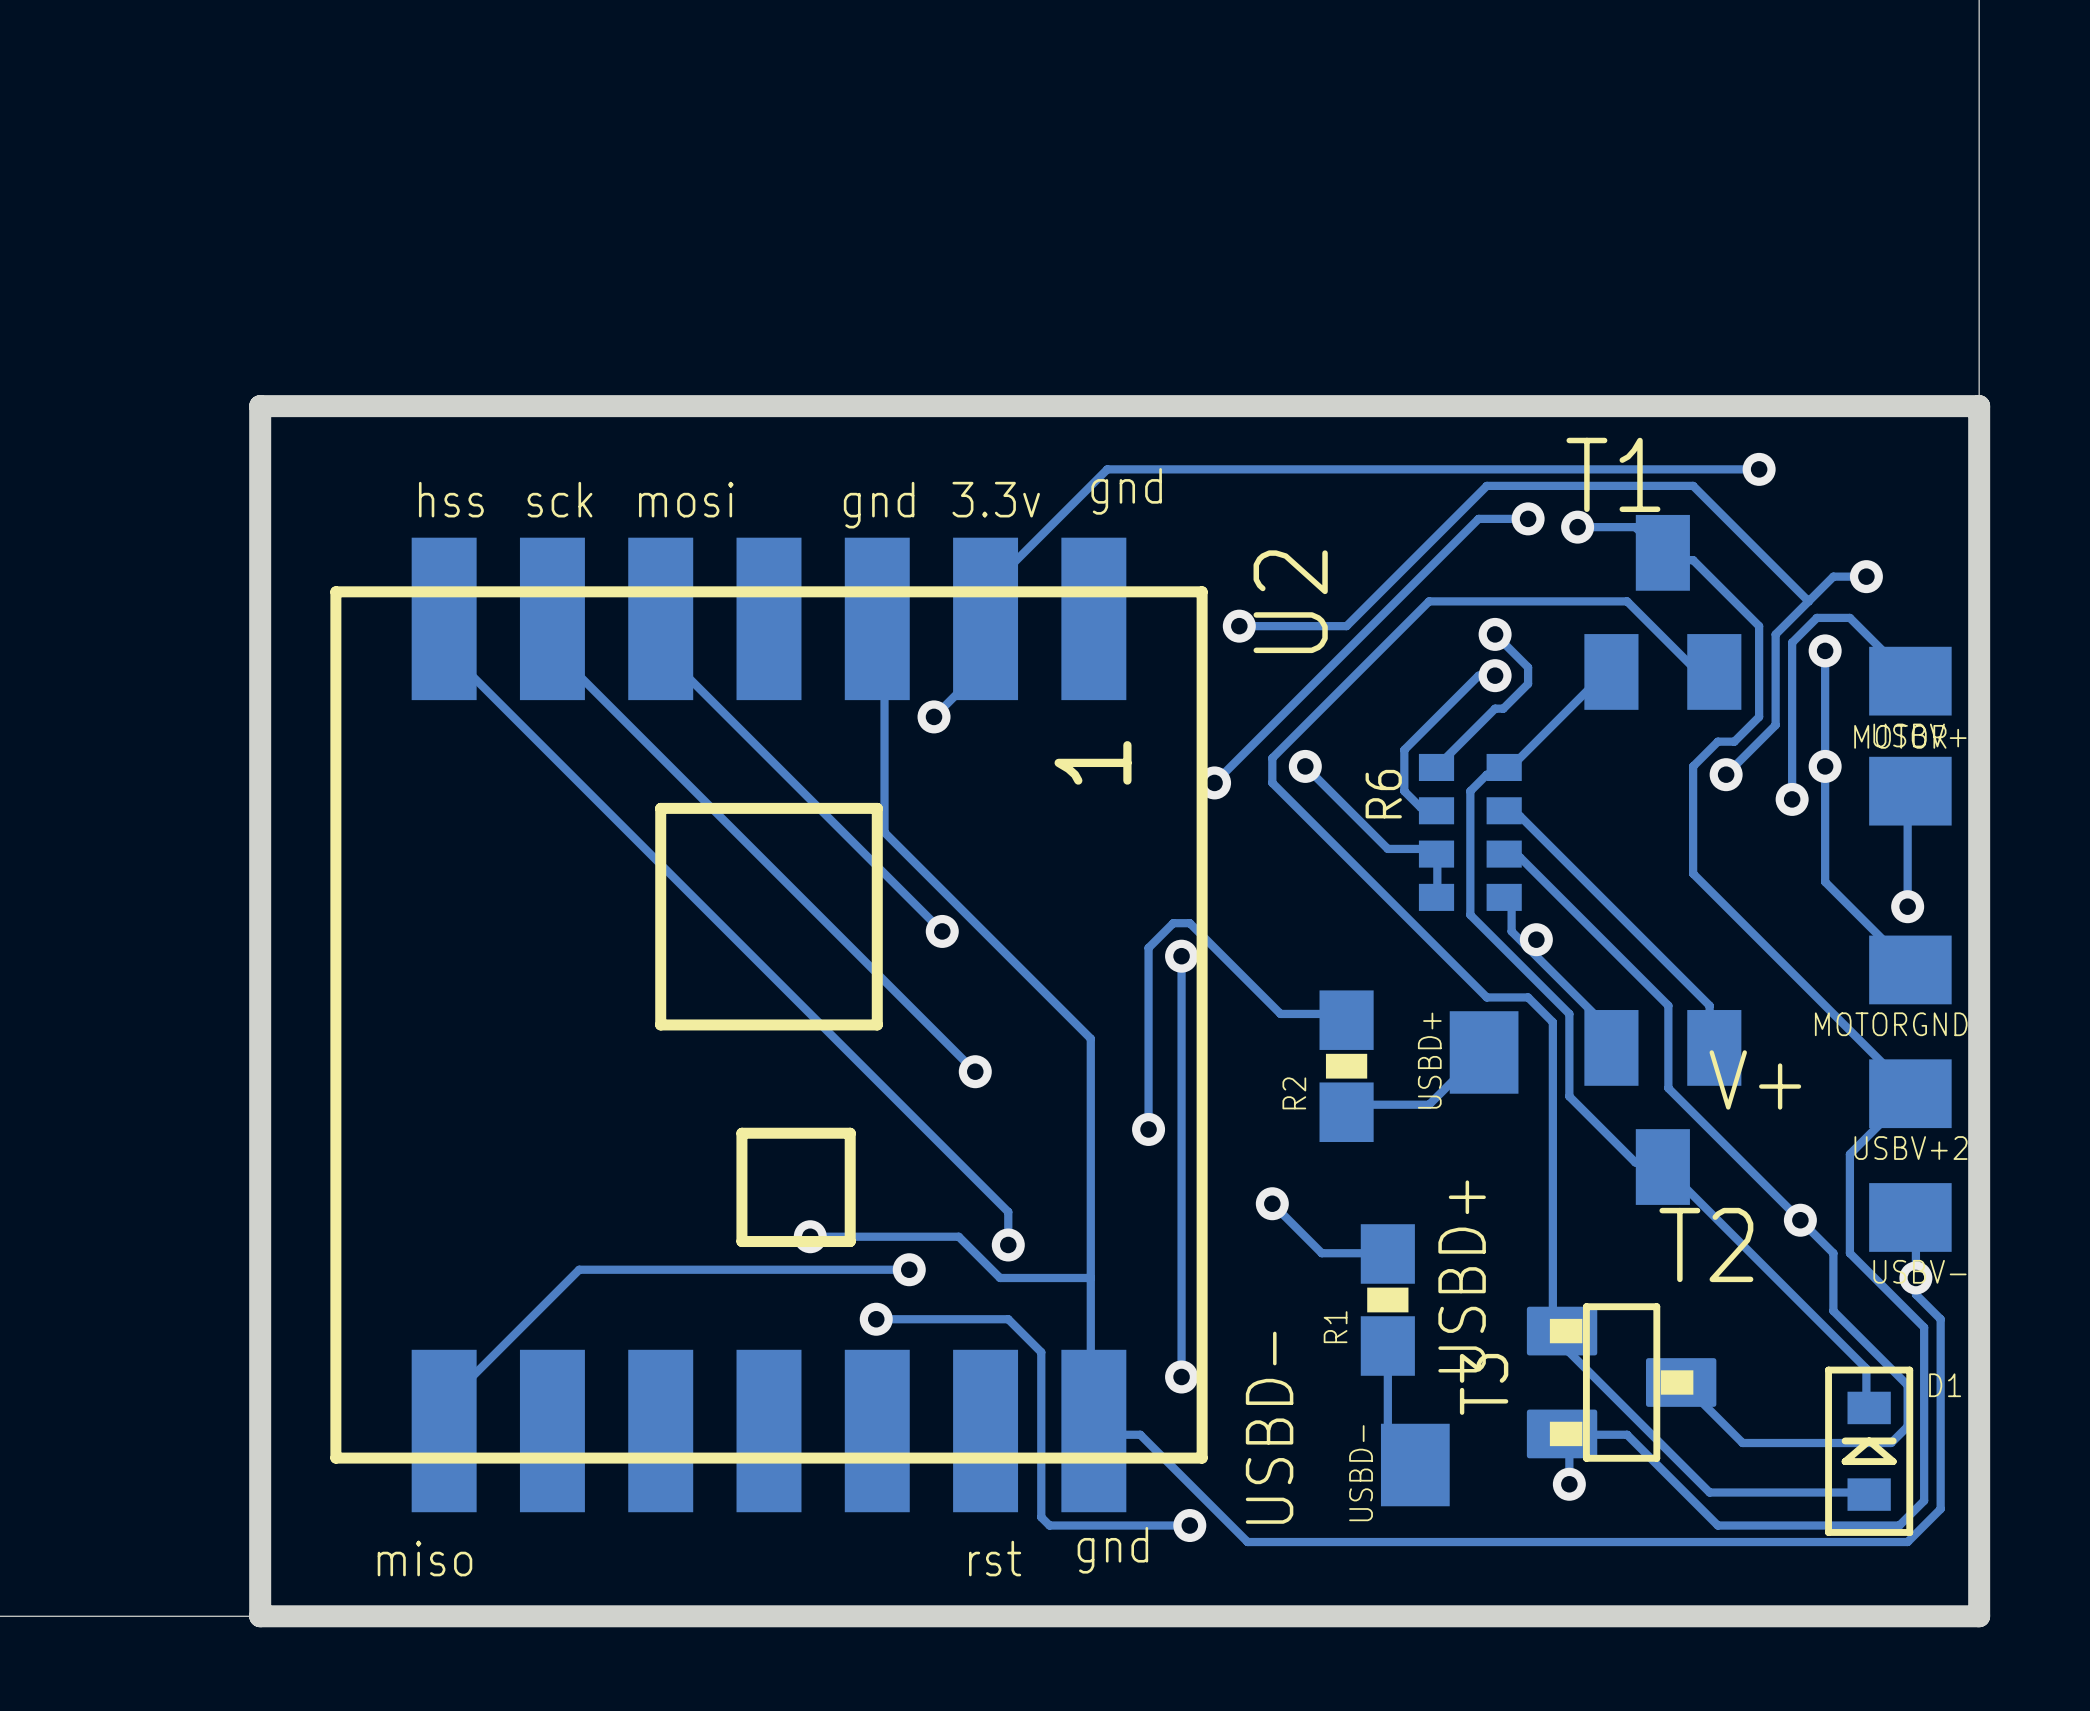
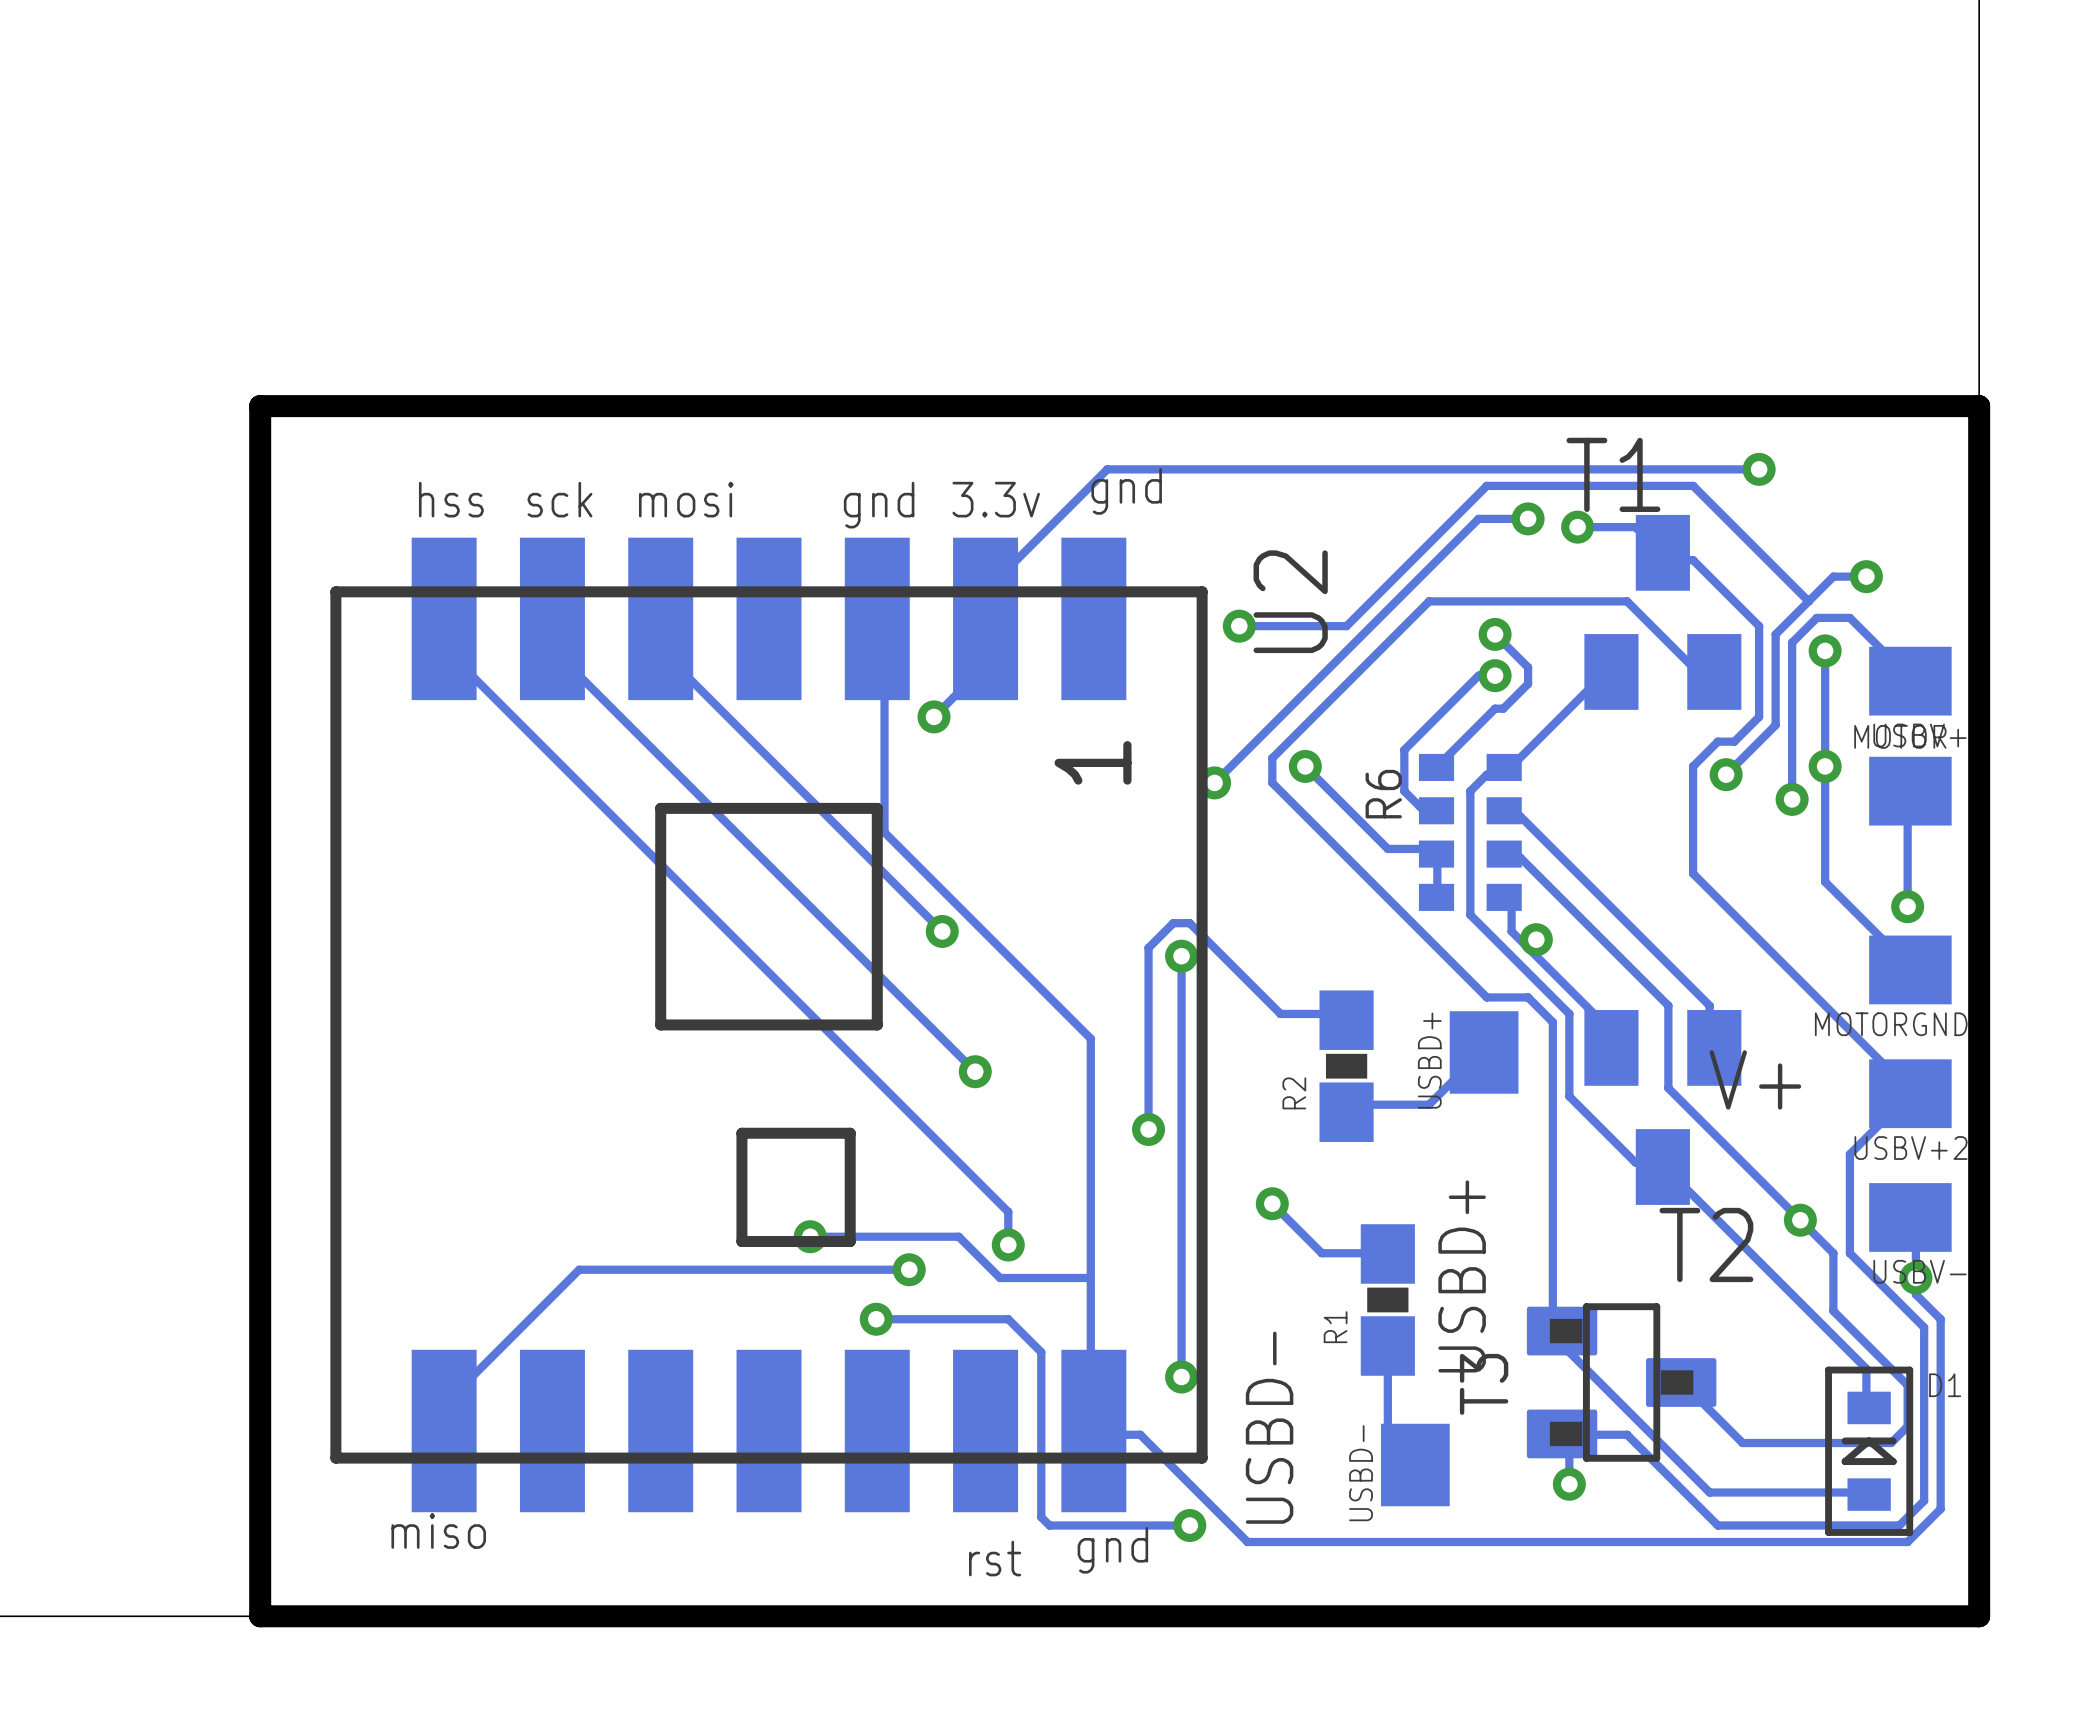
text position: miso (424, 1558) -> miso (438, 1531)

